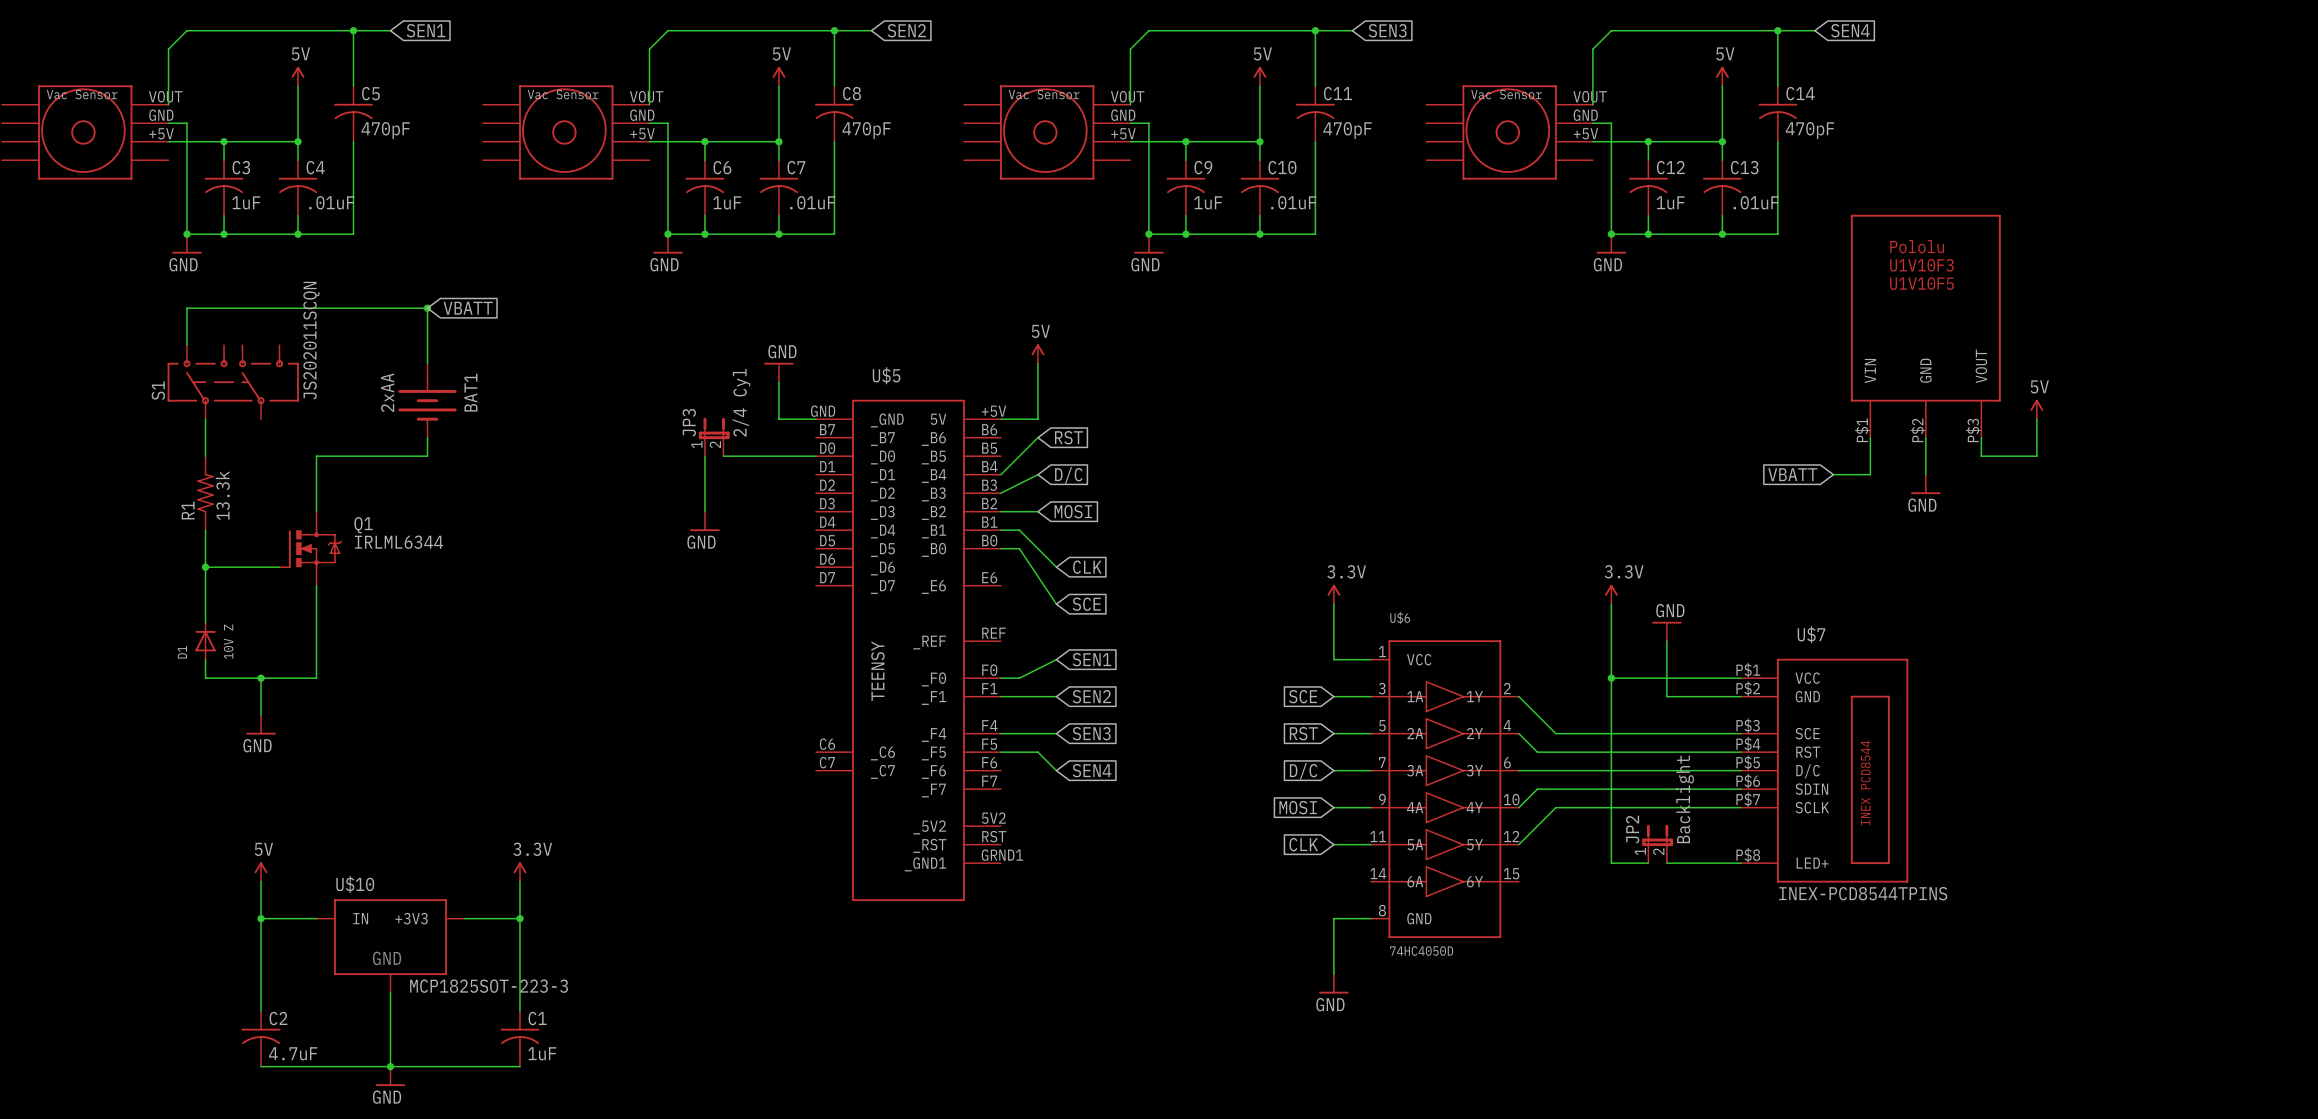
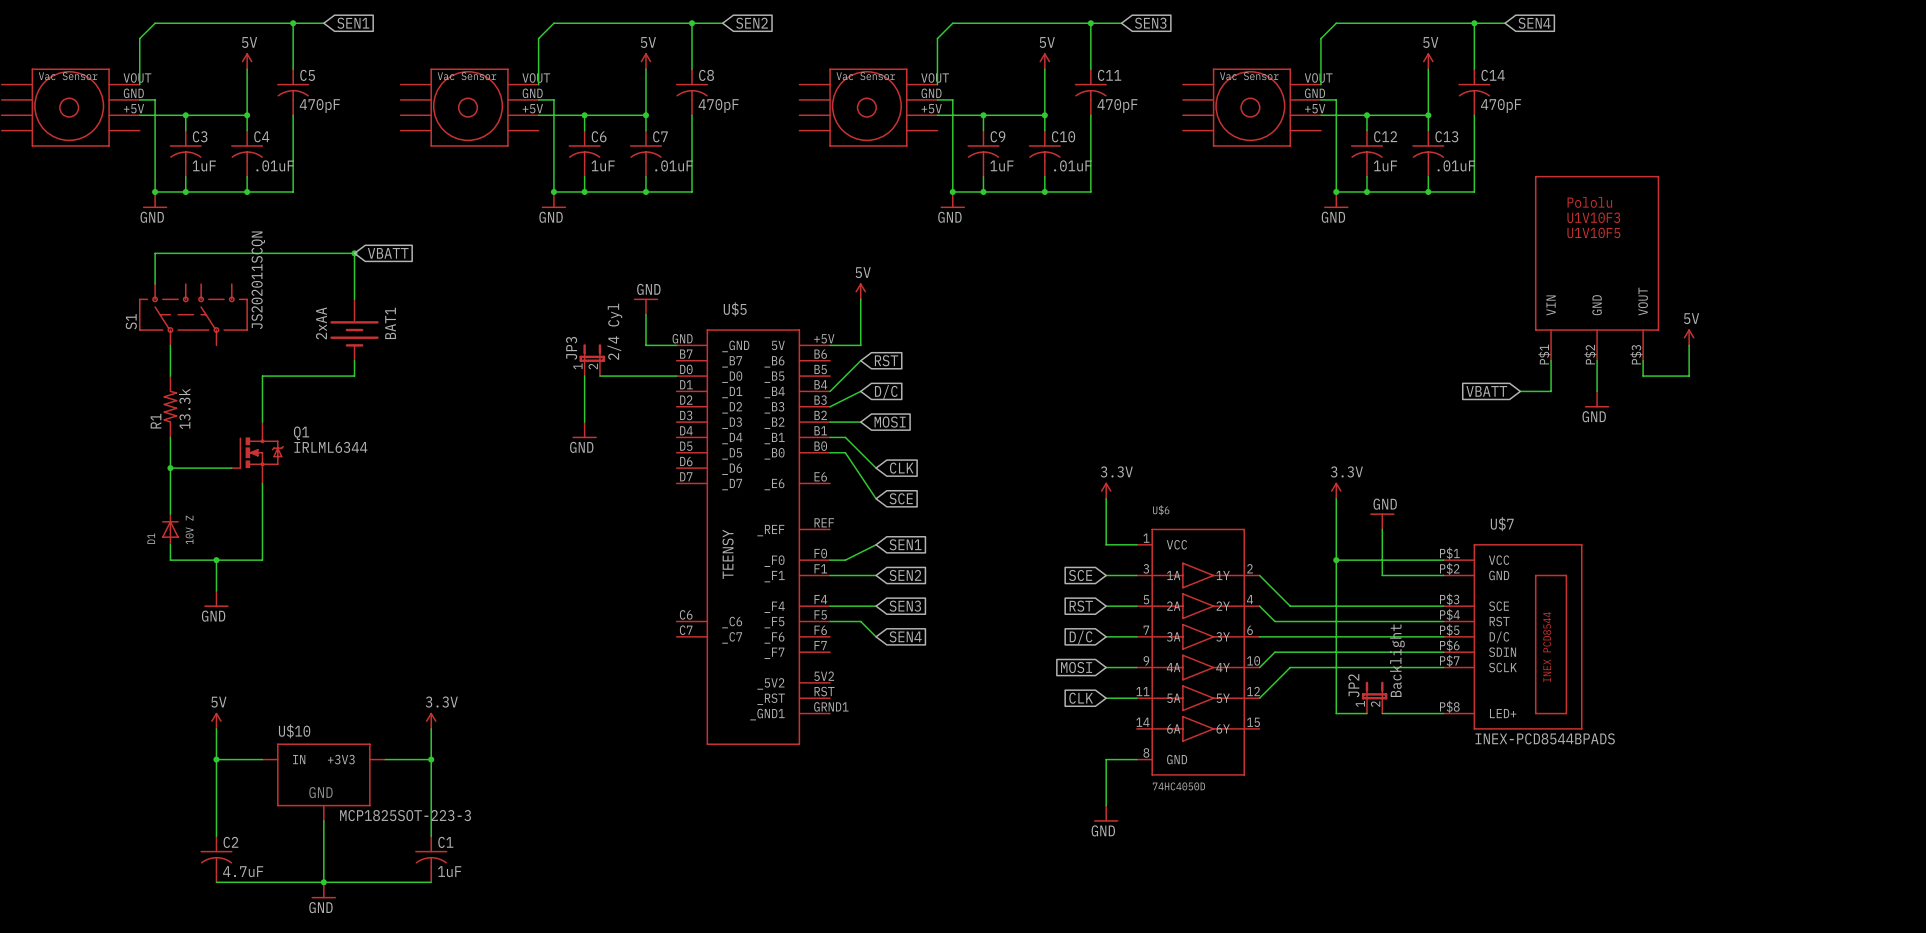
U$7 value: INEX-PCD8544TPINS (1863, 893) -> INEX-PCD8544BPADS (1545, 738)

